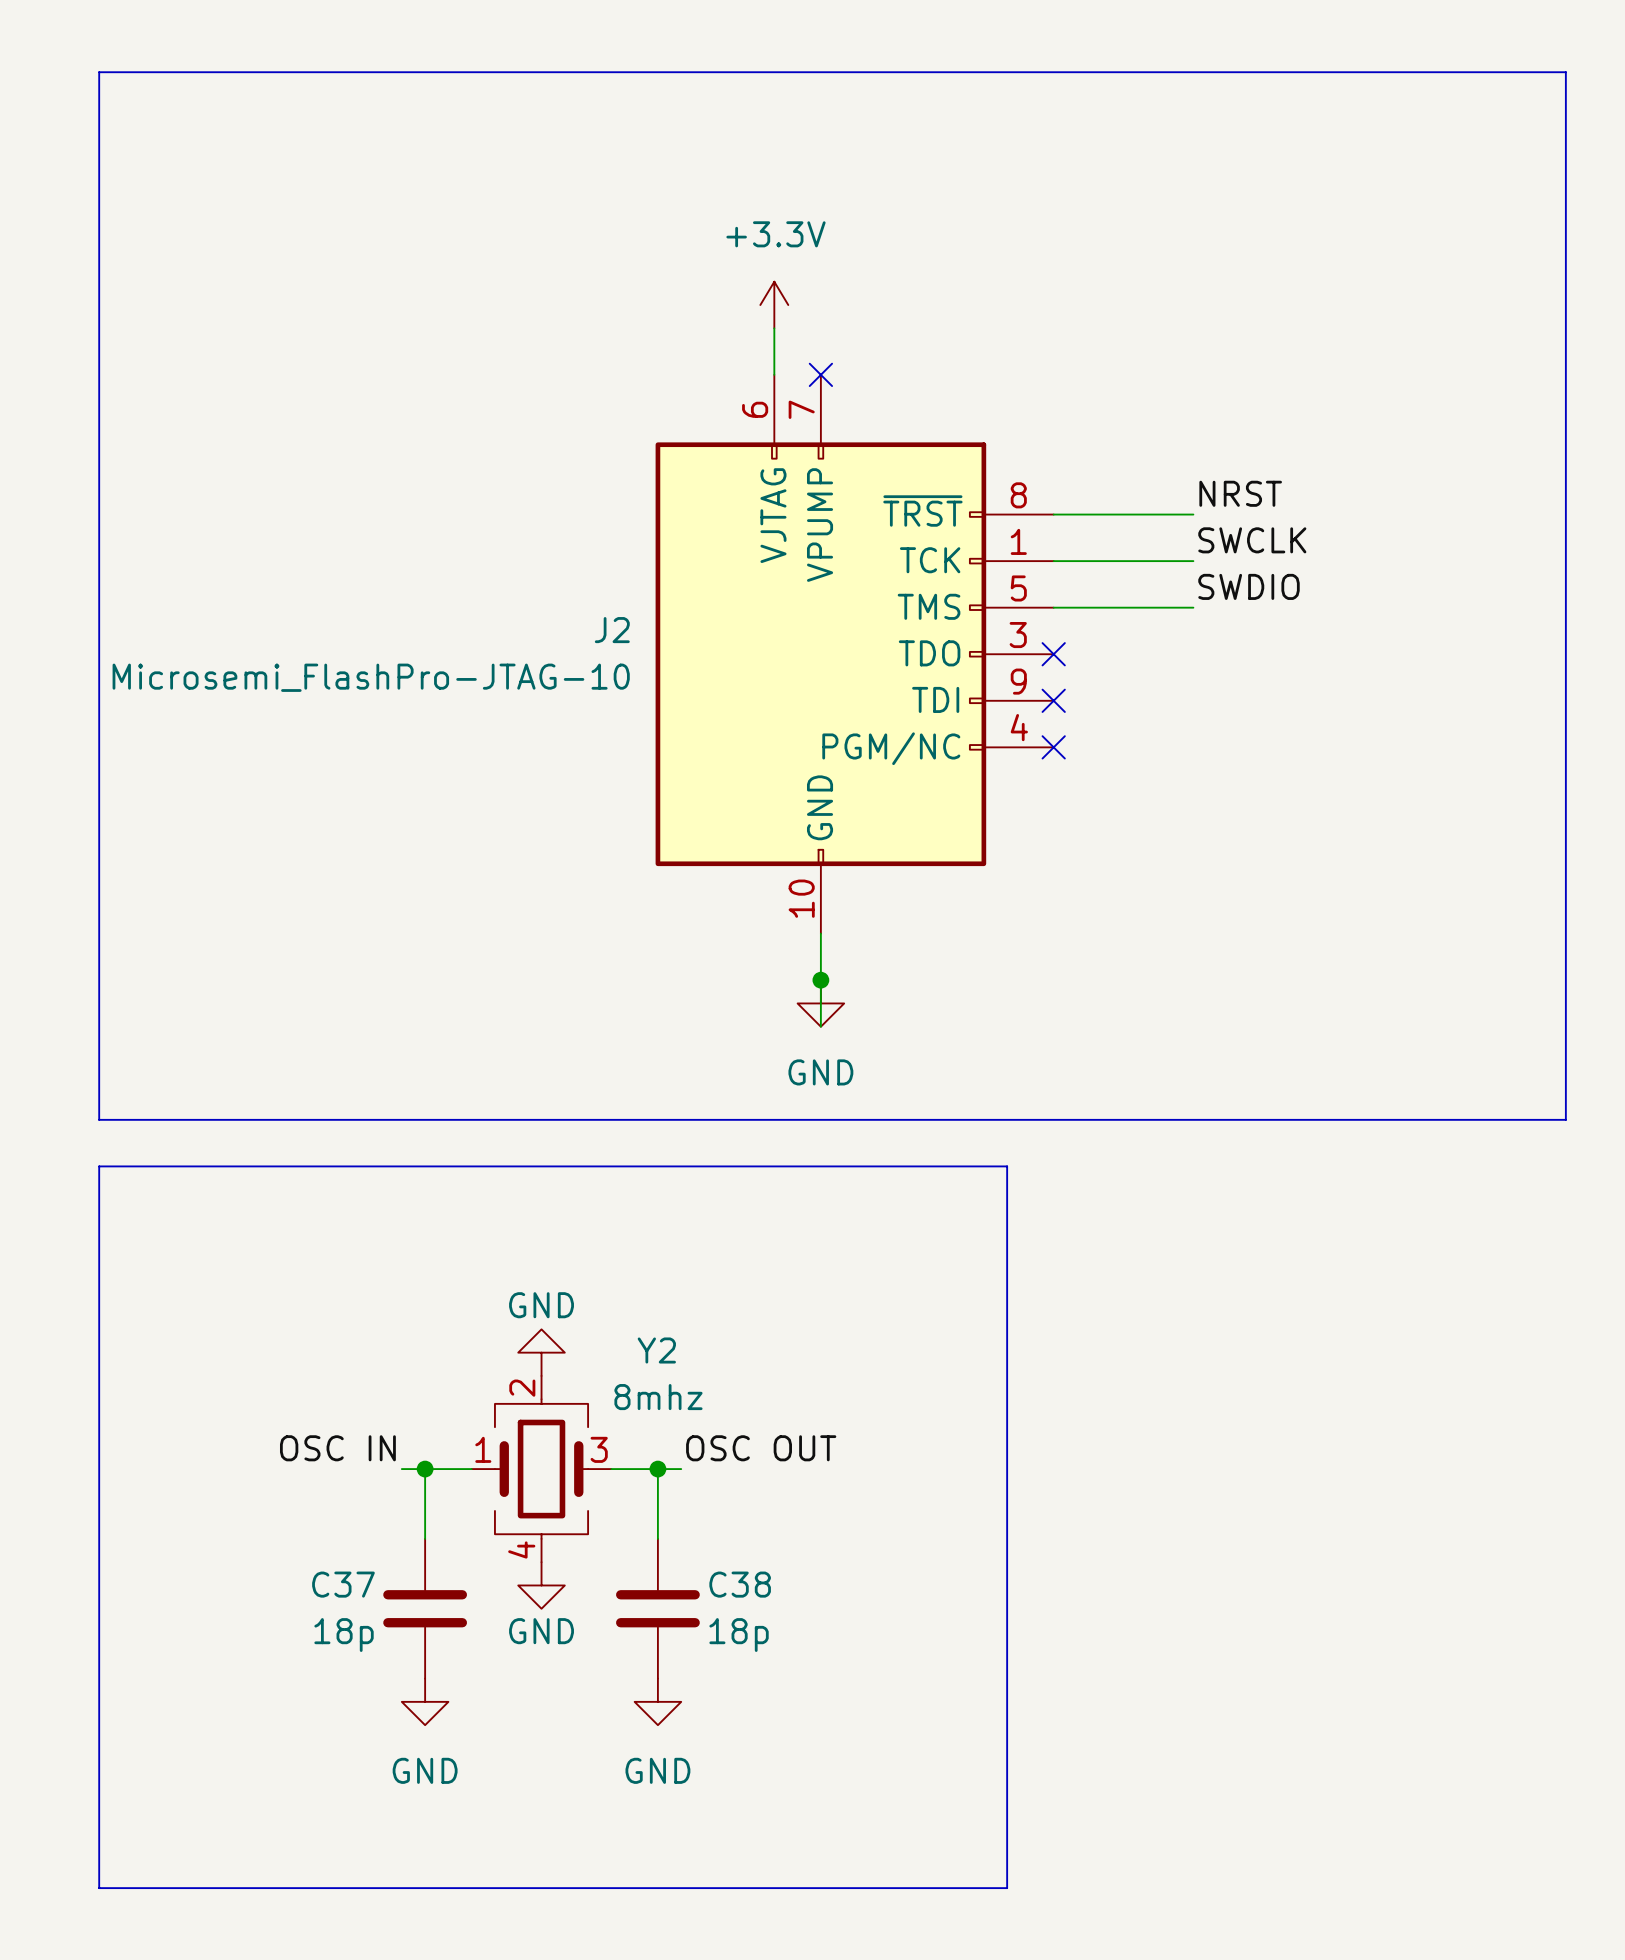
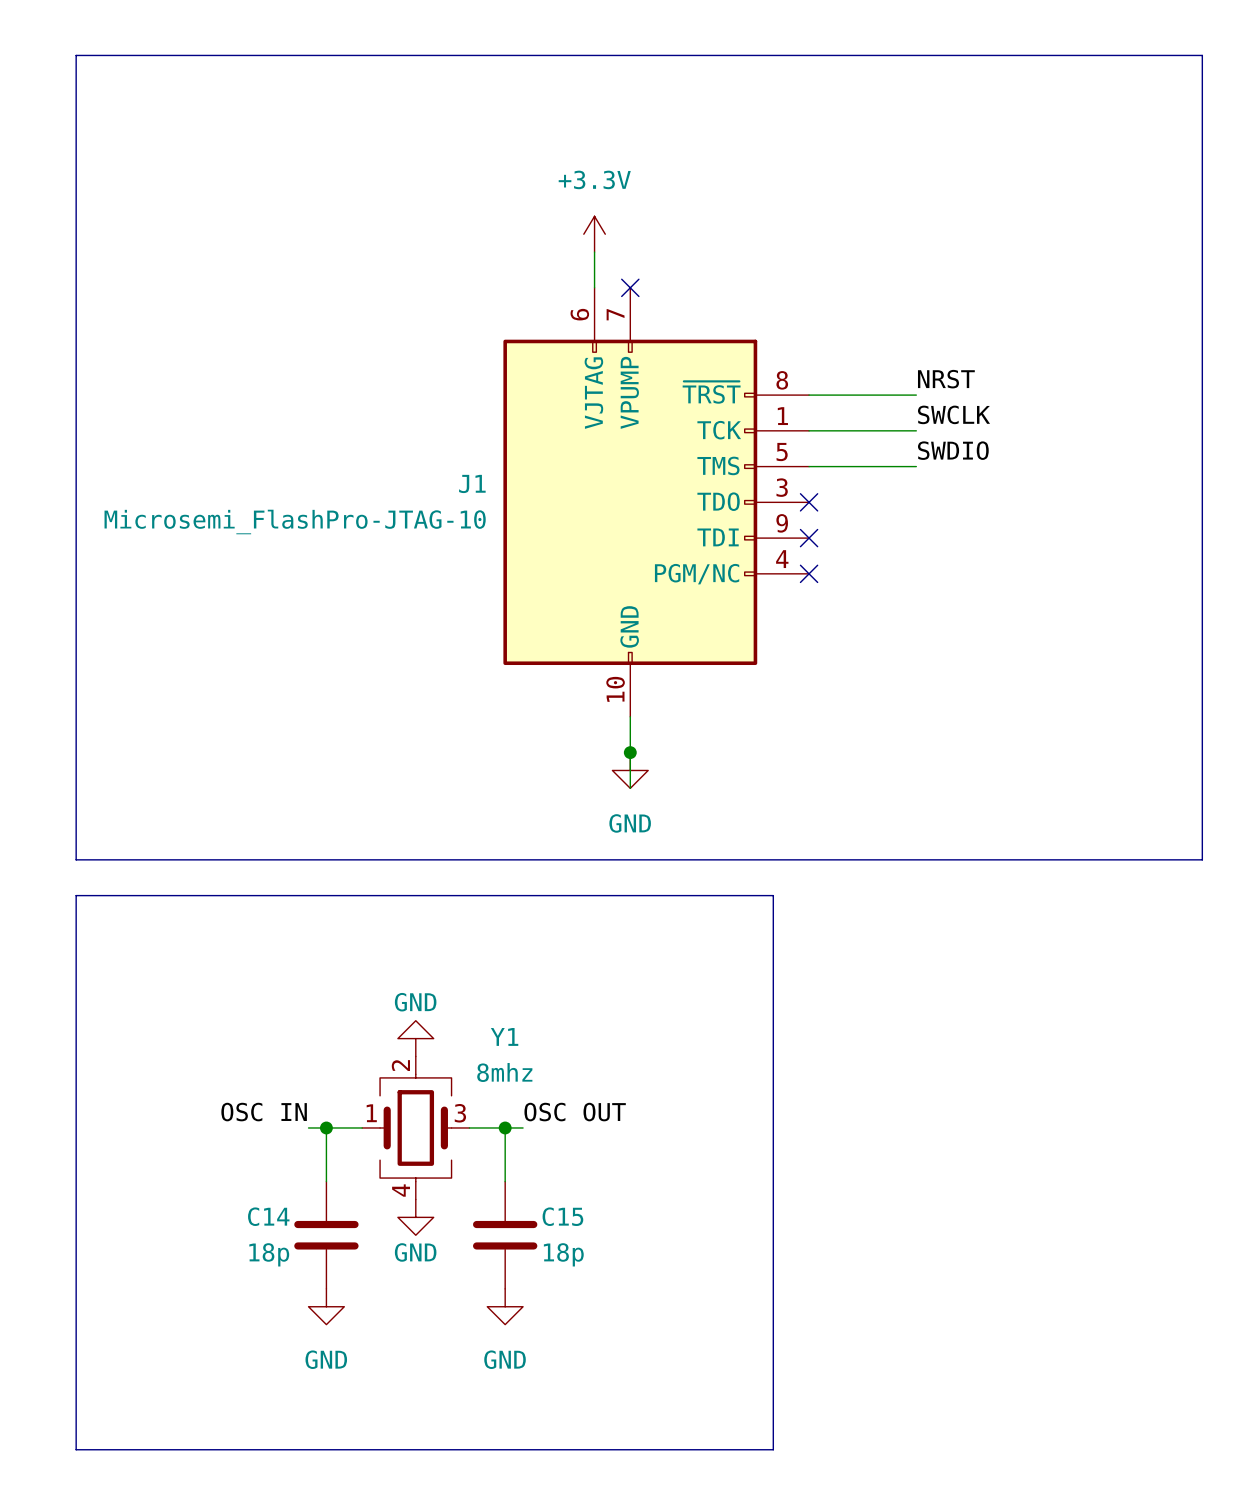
J2 name: J2 (612, 630) -> J1 (472, 483)
Y2 name: Y2 (656, 1350) -> Y1 (504, 1036)
C37 name: C37 (343, 1584) -> C14 (268, 1216)
C38 name: C38 (740, 1584) -> C15 (562, 1216)

